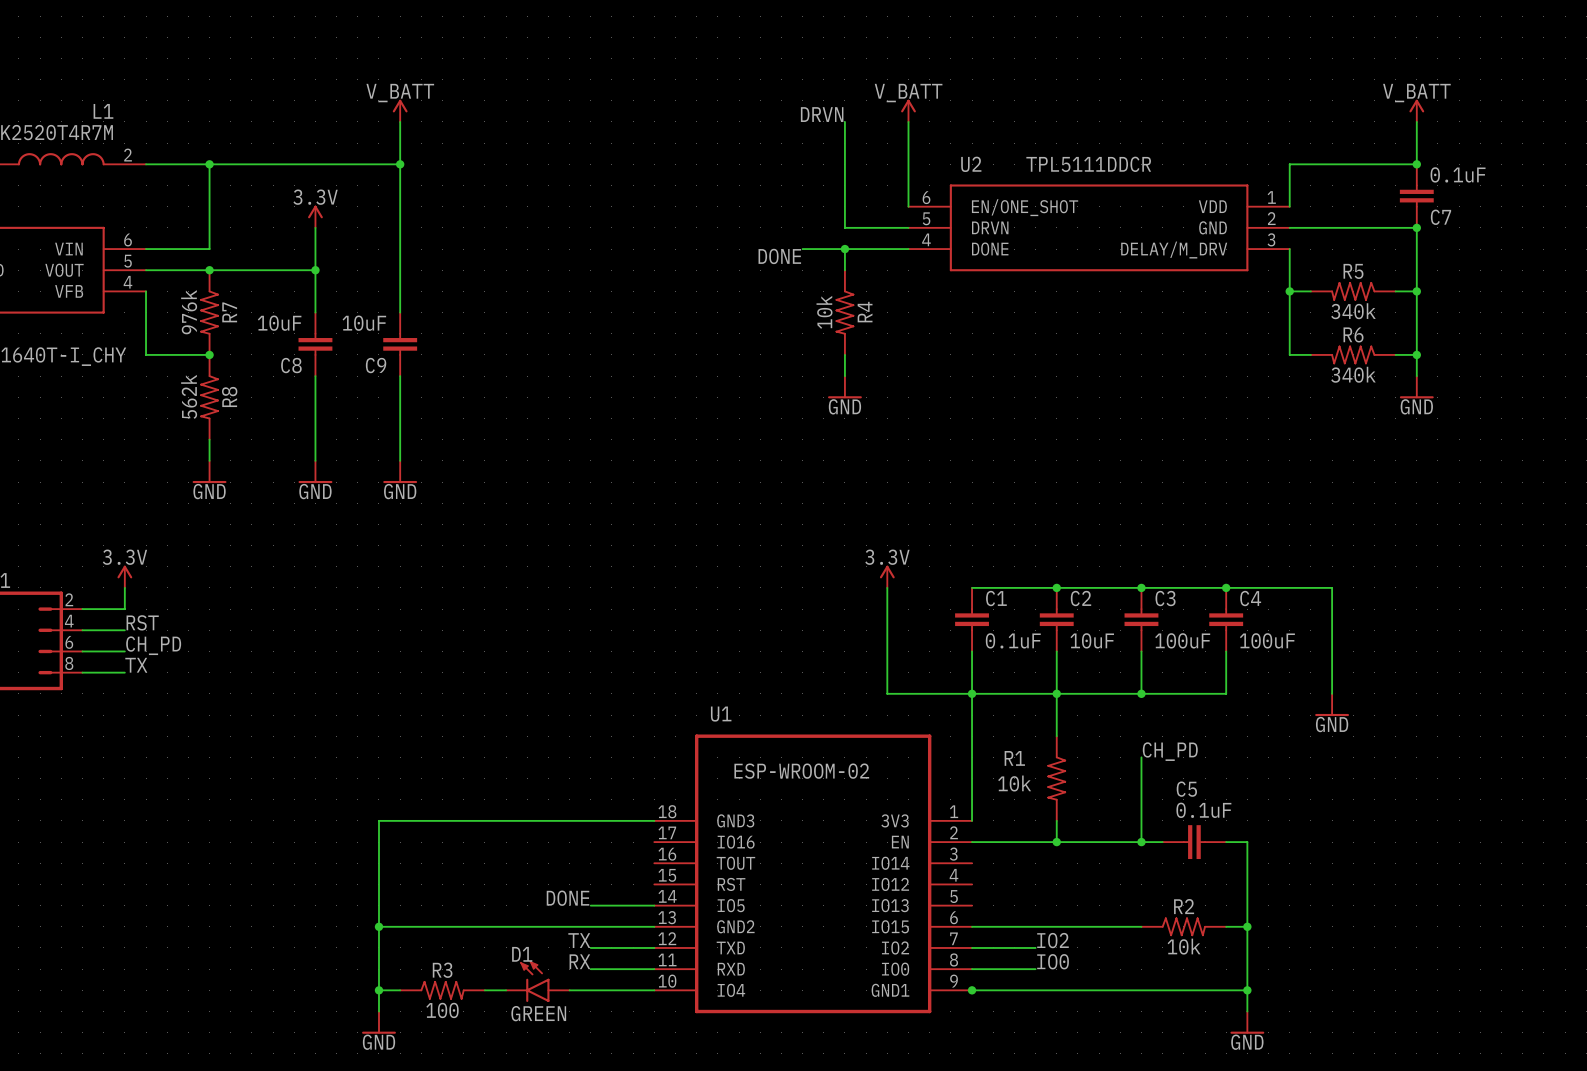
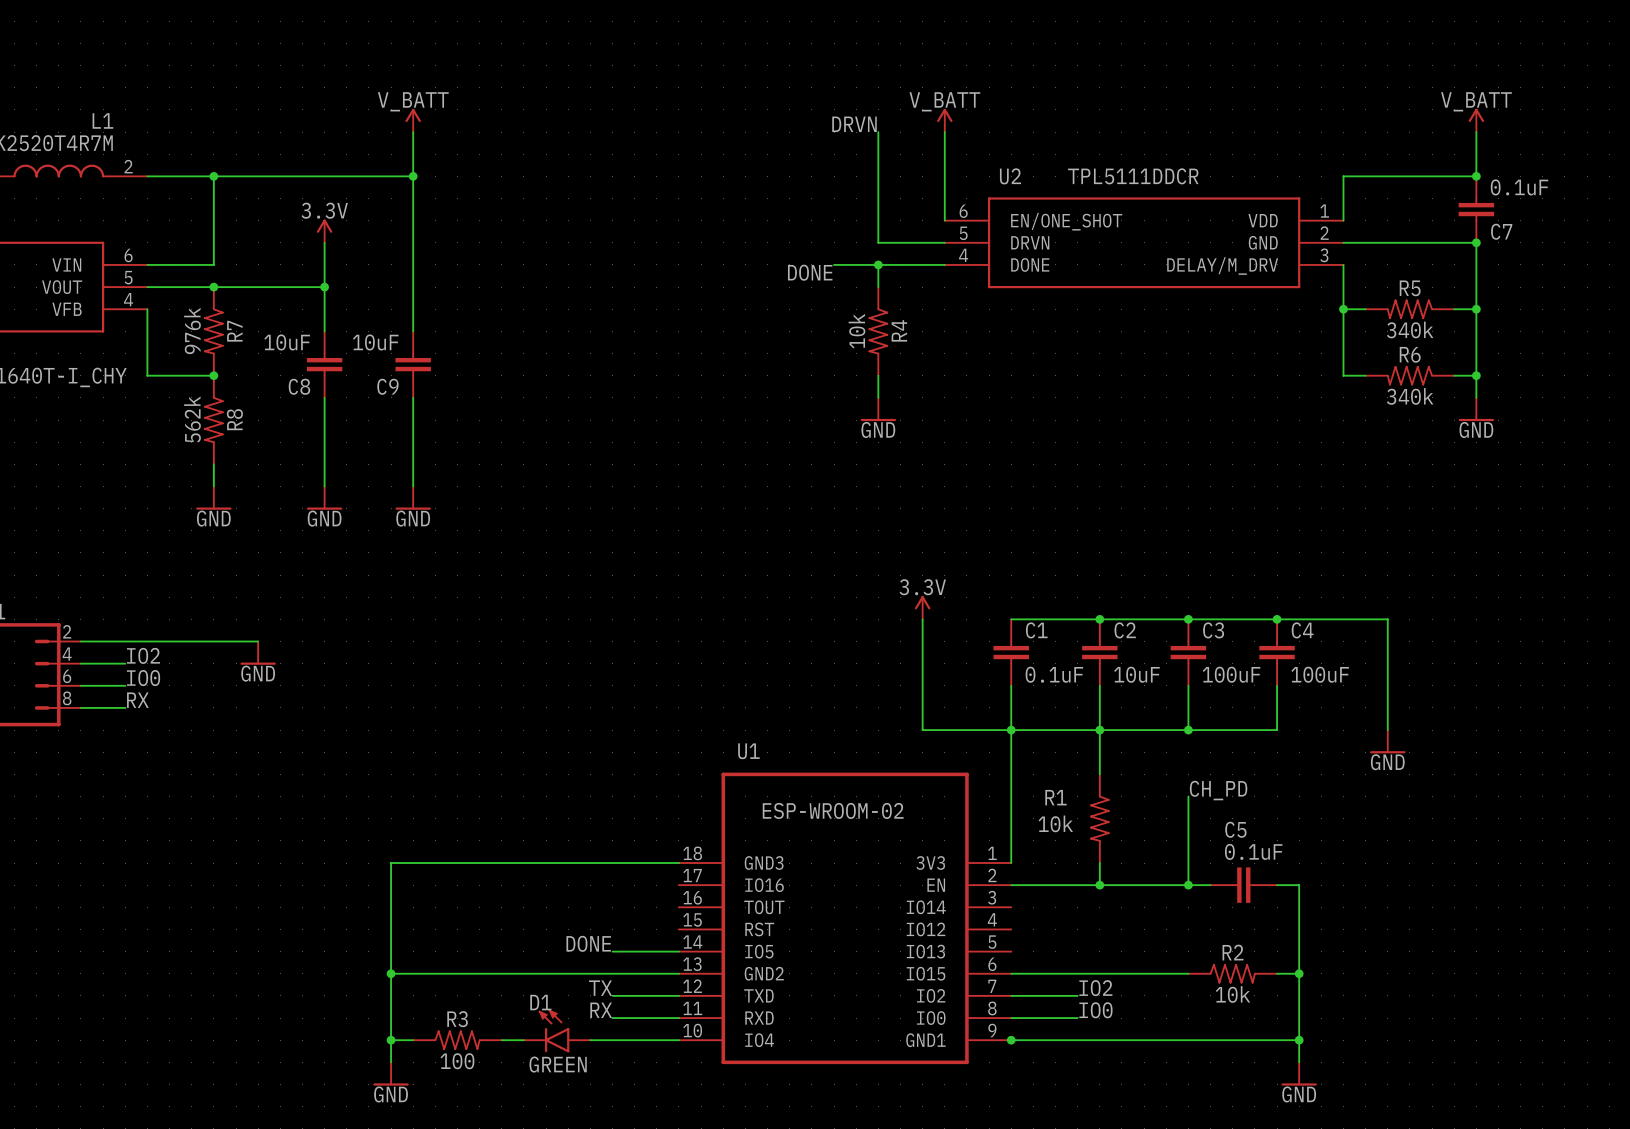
power symbol: 3.3V (124, 576) -> none
wire: (124, 587) (124, 609) -> (258, 641) (125, 641)
power symbol: none -> GND (258, 653)
label: RST (142, 622) -> IO2 (143, 655)
label: CH_PD (153, 645) -> IO0 (143, 678)
label: TX (136, 665) -> RX (137, 700)

